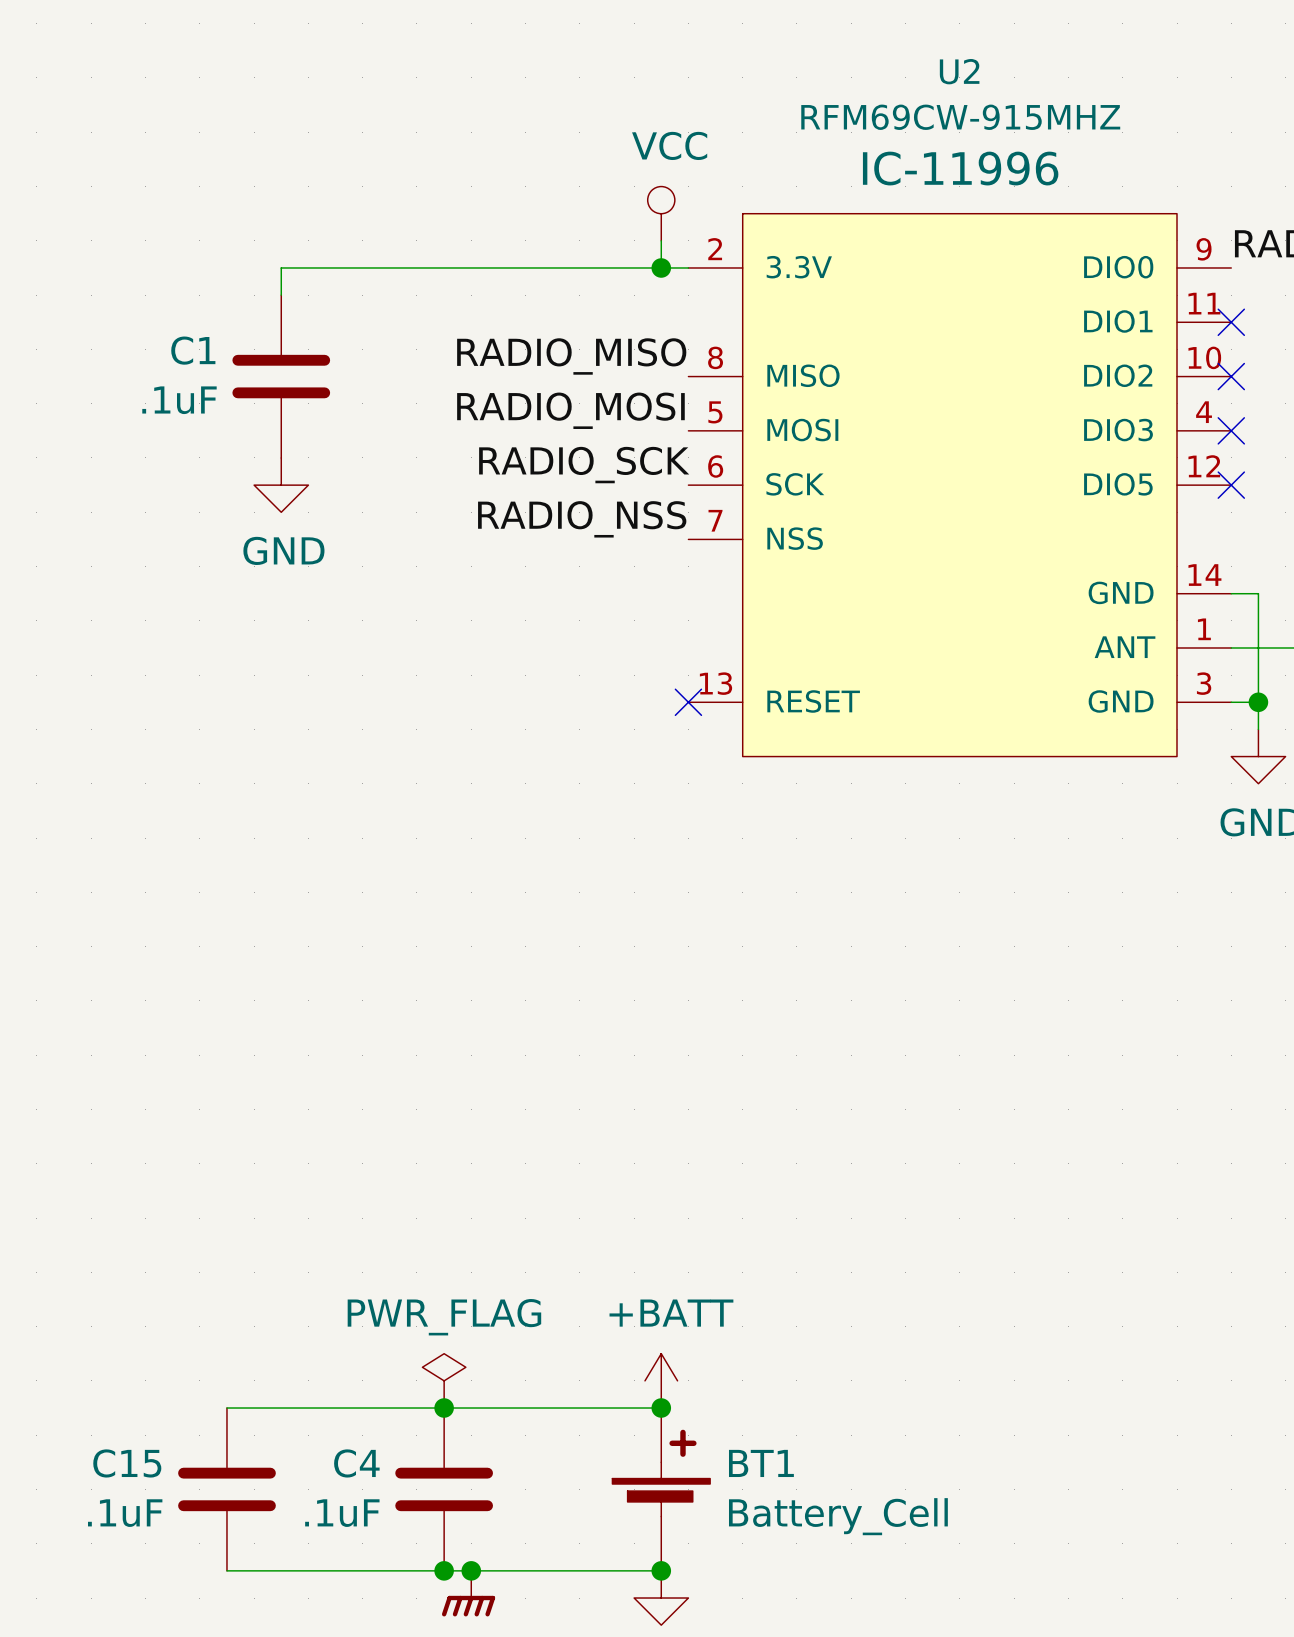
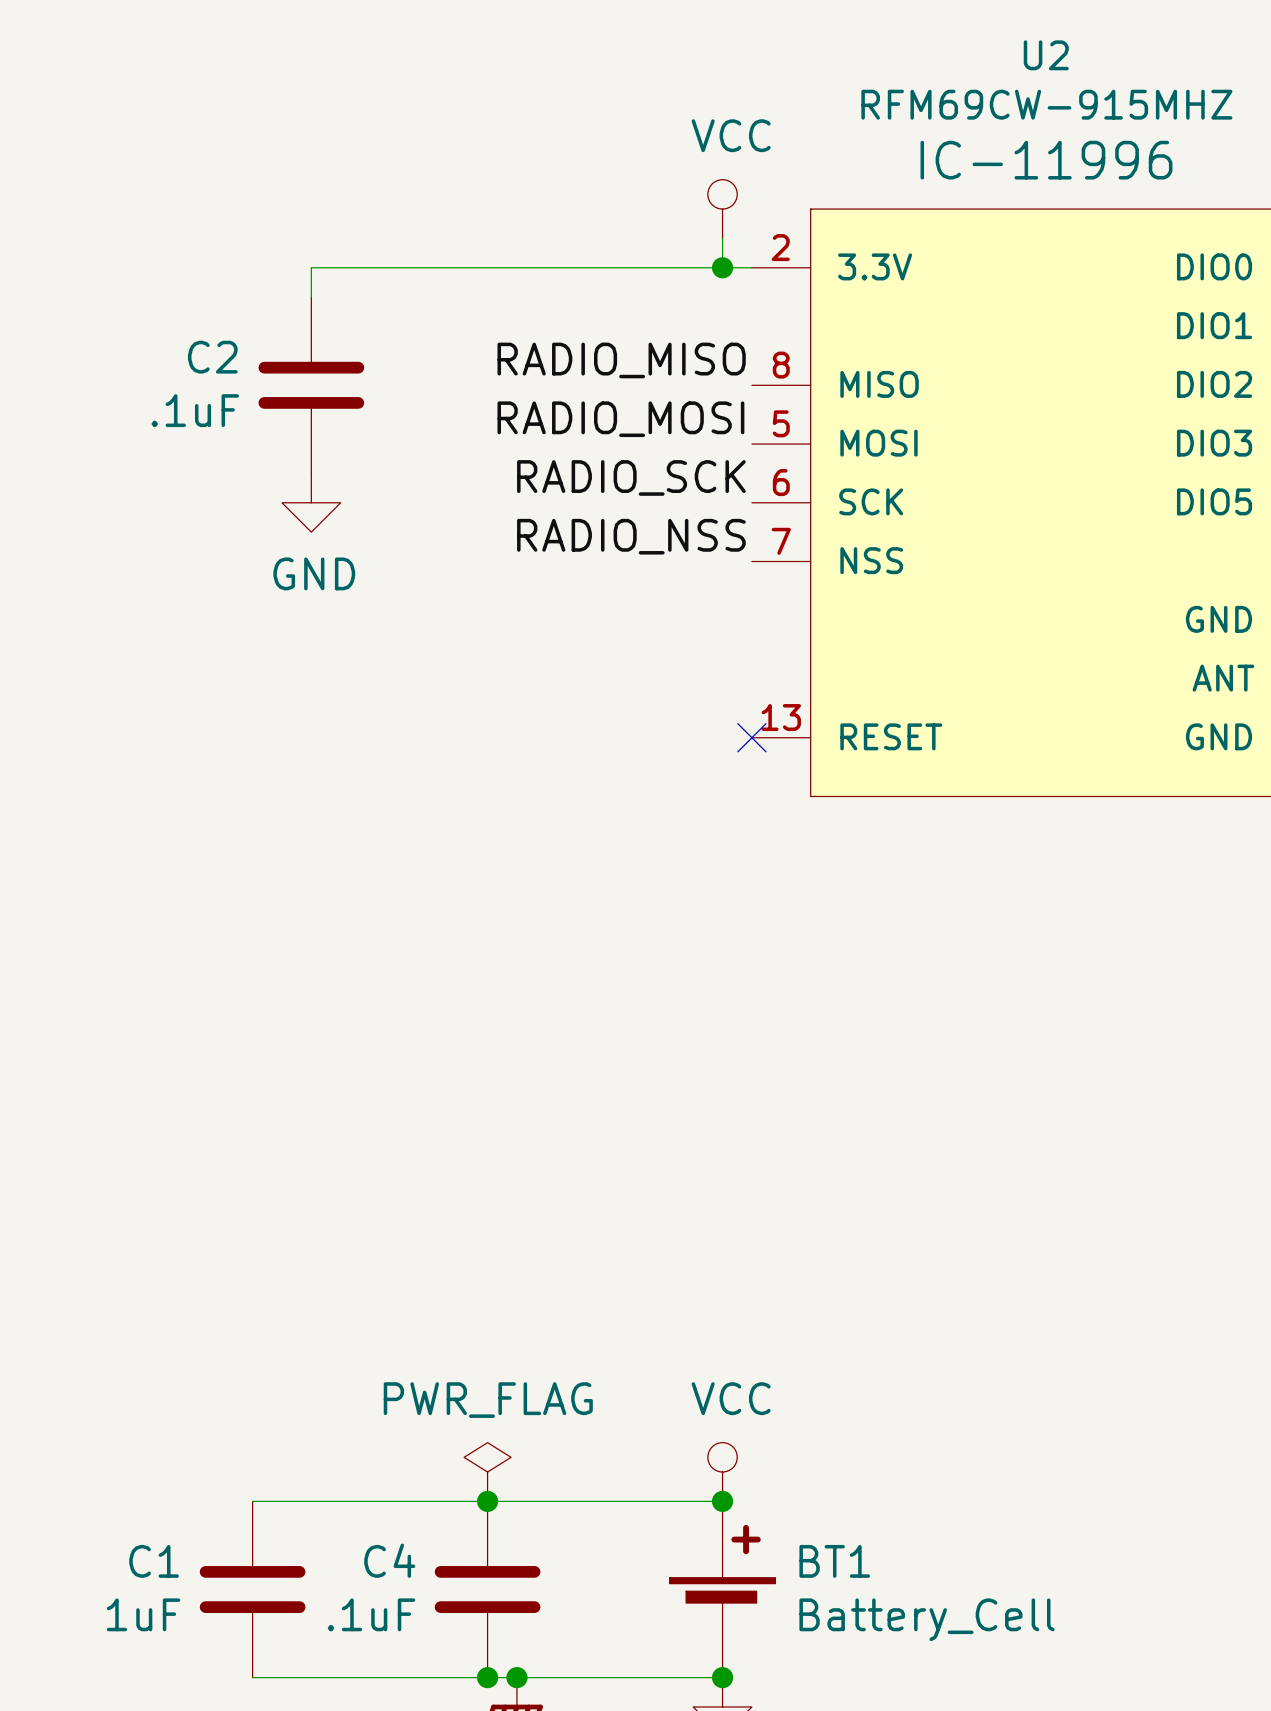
C1 name: C1 (193, 350) -> C2 (212, 357)
power symbol: +BATT (661, 1380) -> VCC (722, 1472)
C15 name: C15 (127, 1463) -> C1 (154, 1561)
C15 value: .1uF (125, 1513) -> 1uF (143, 1614)

